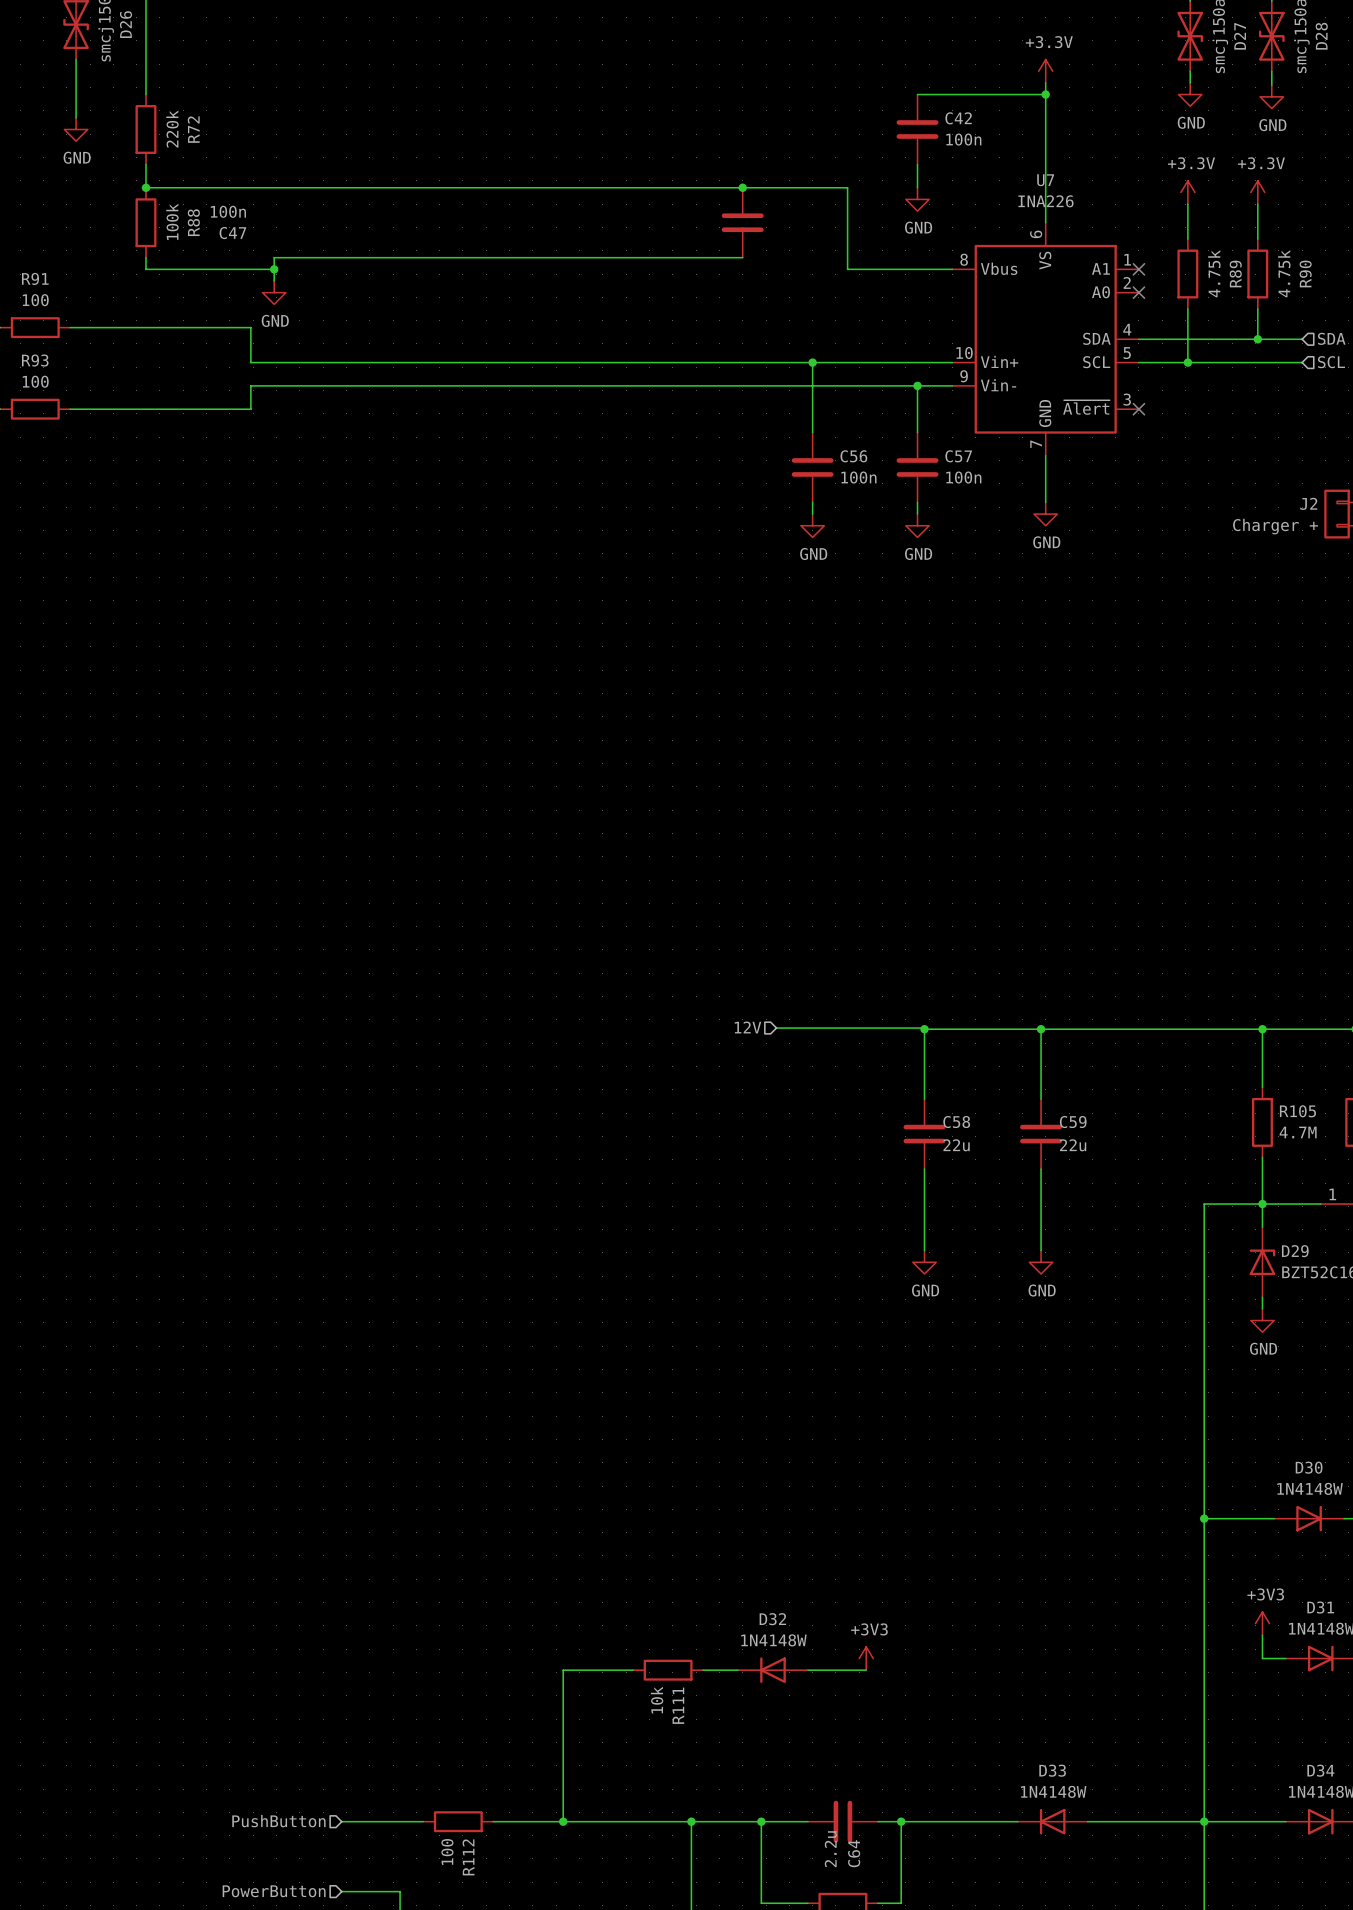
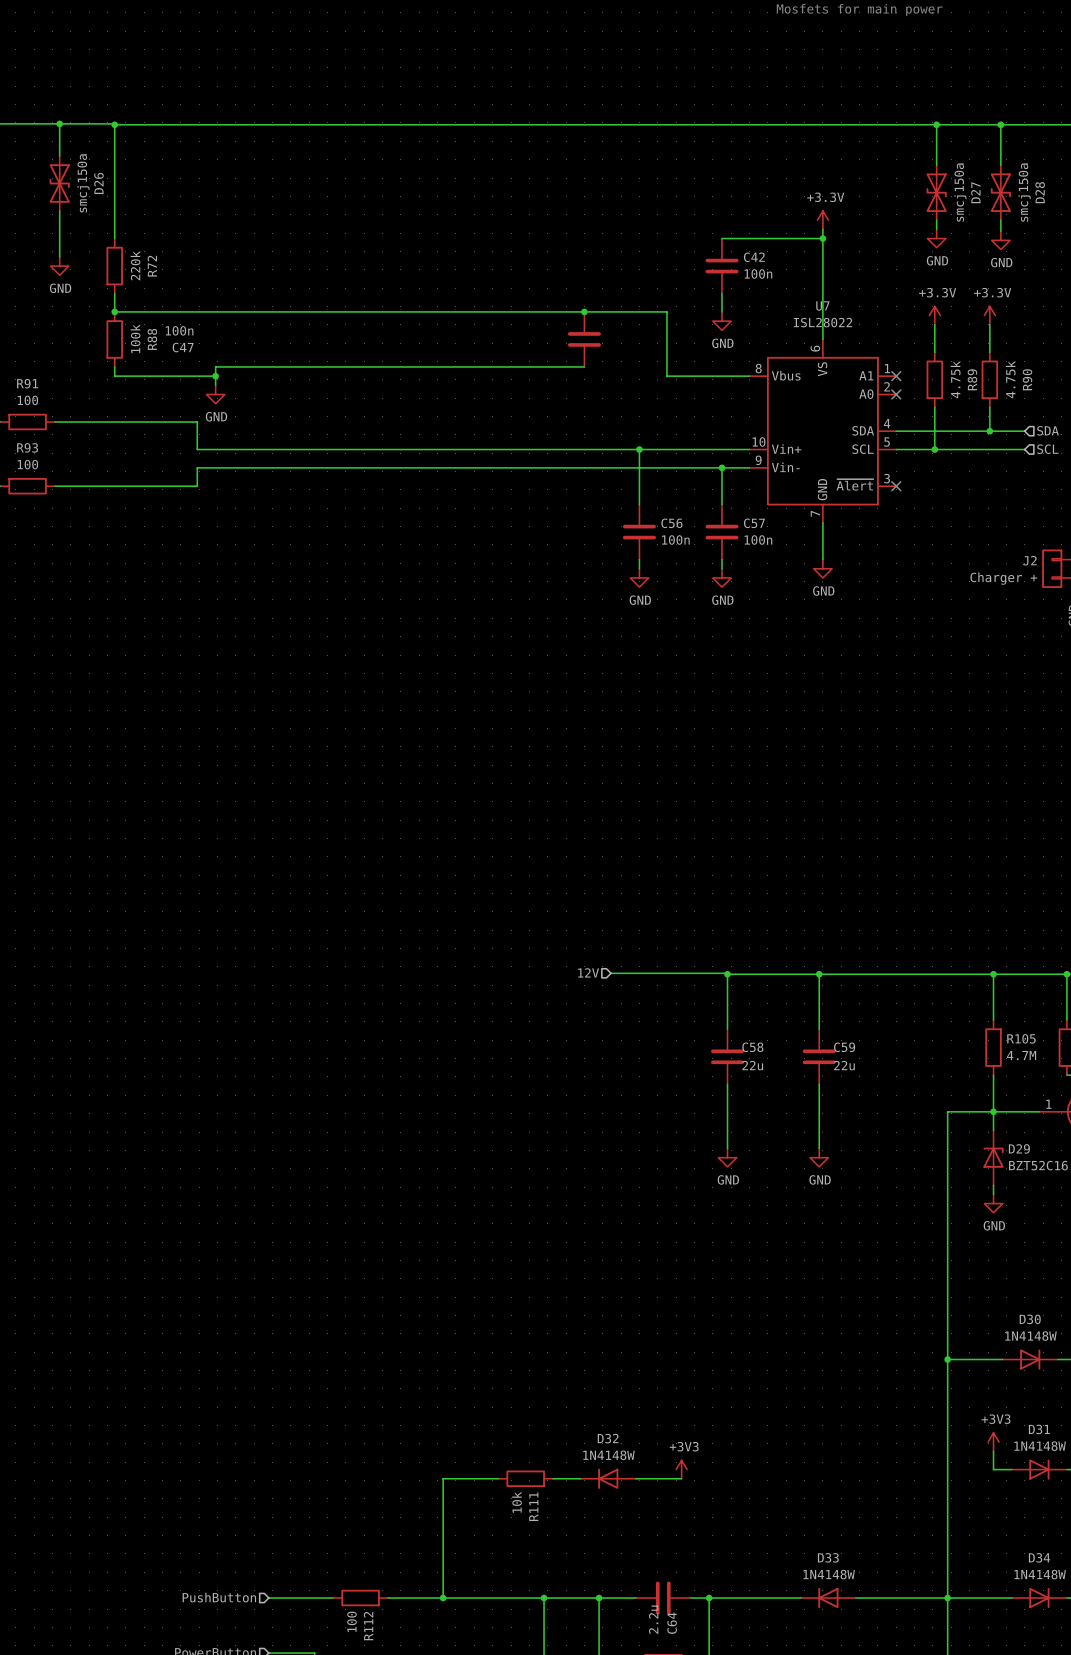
U7 value: INA226 (1045, 201) -> ISL28022 (822, 322)

